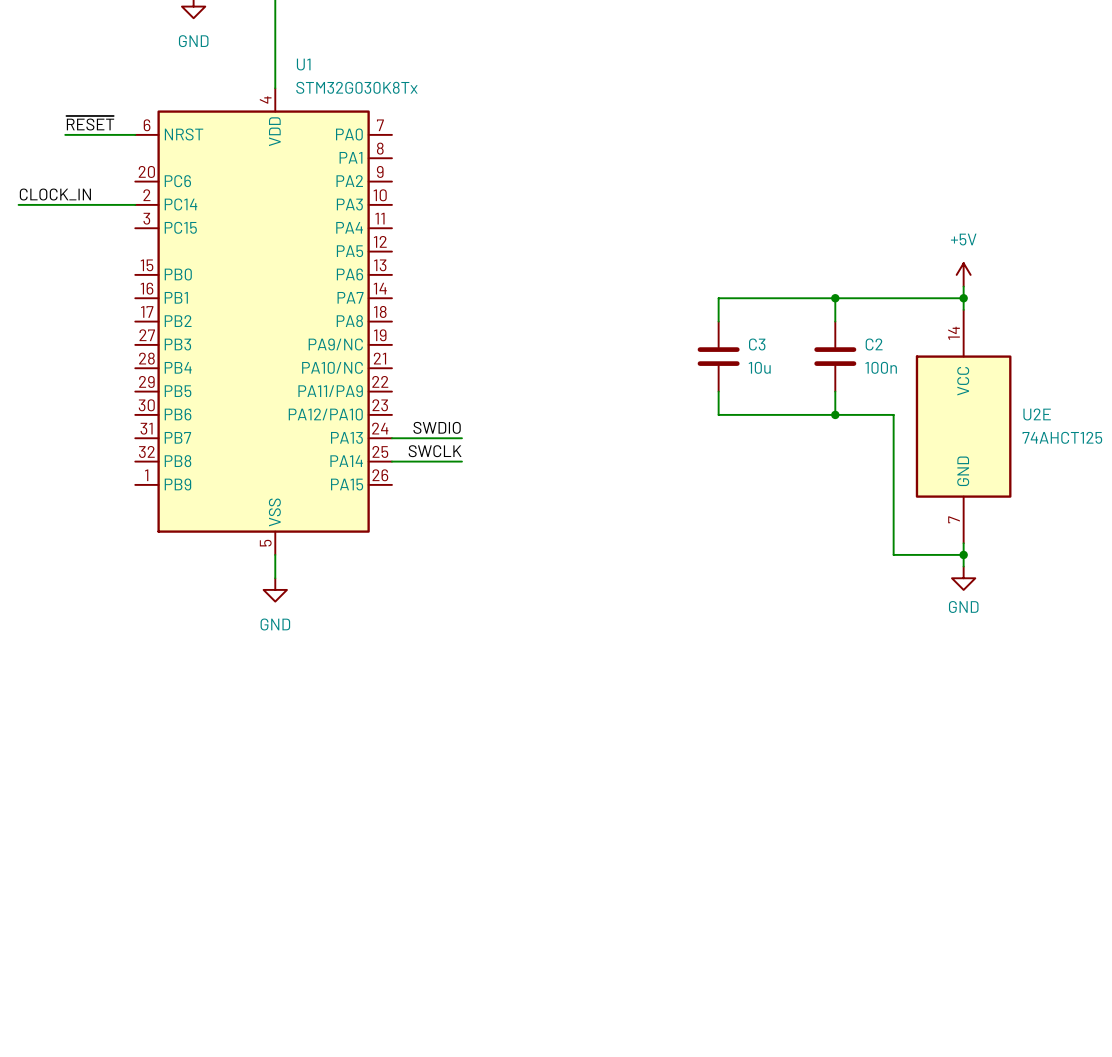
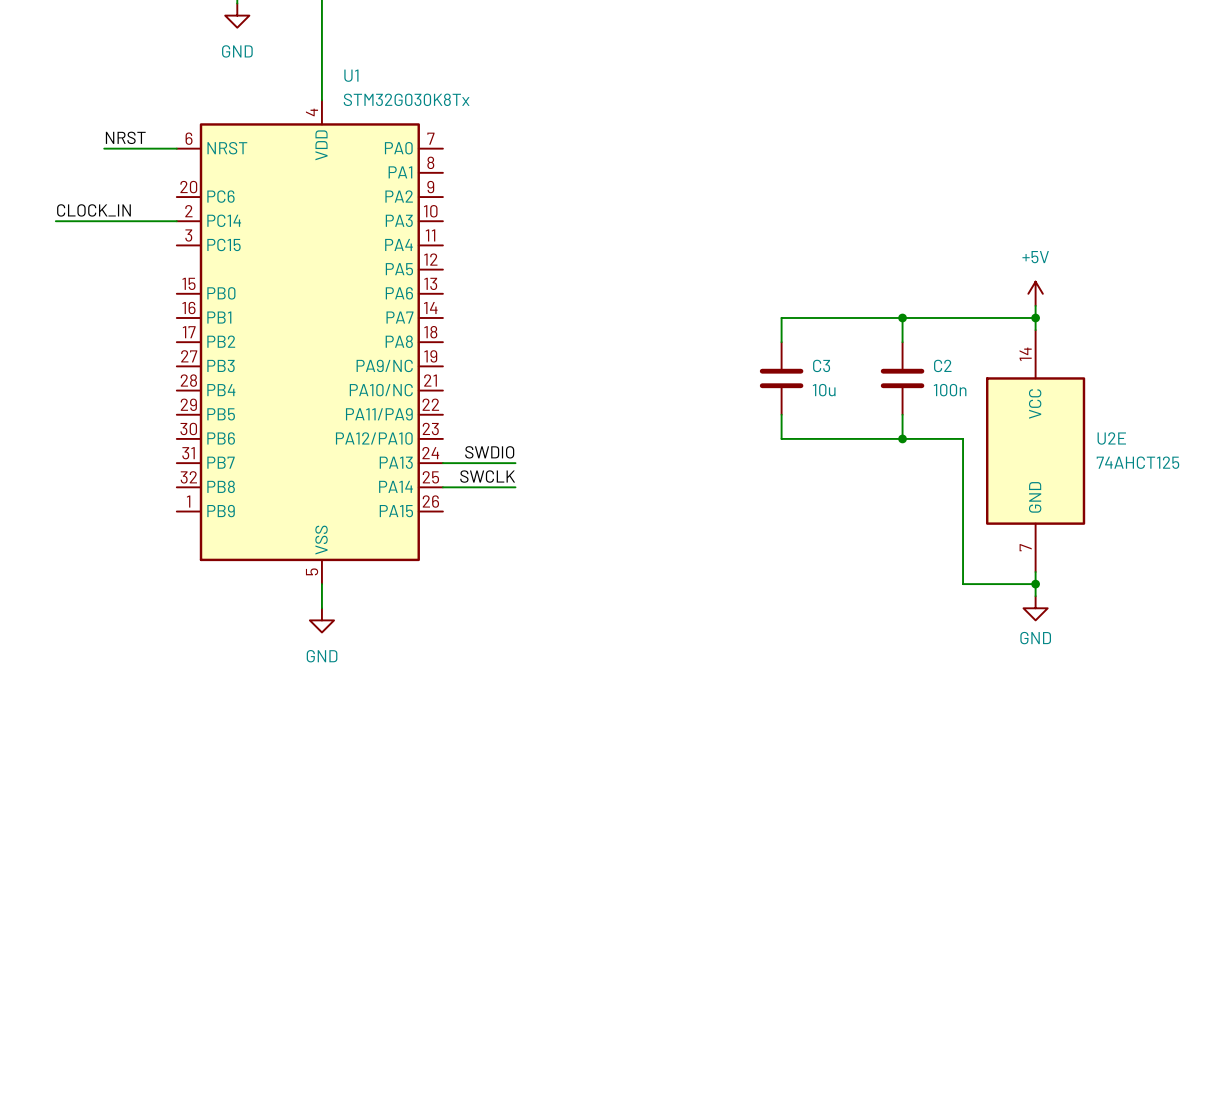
label: ~{RESET} (90, 123) -> NRST (125, 137)

